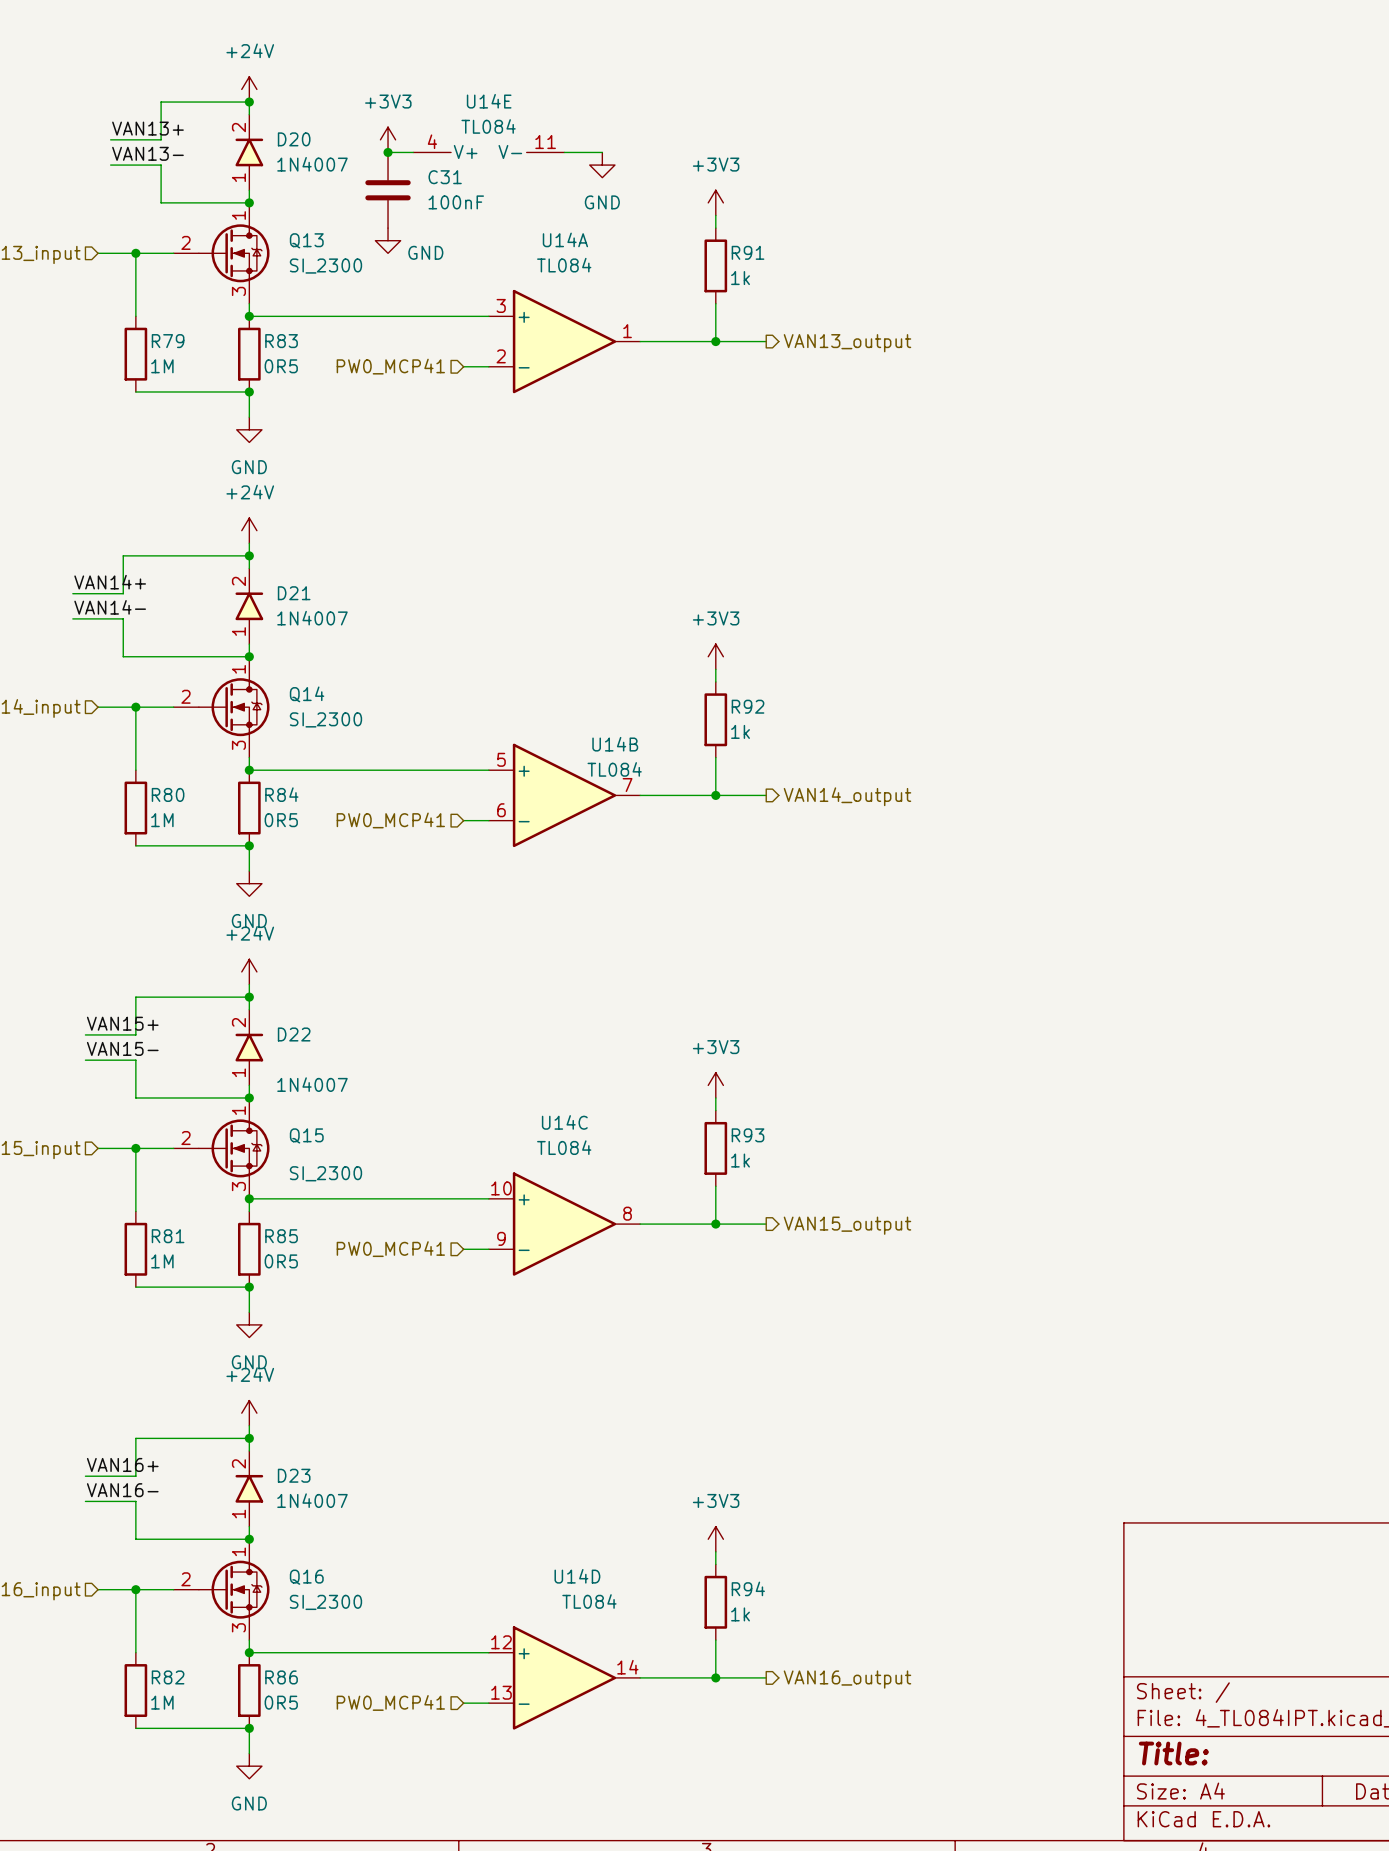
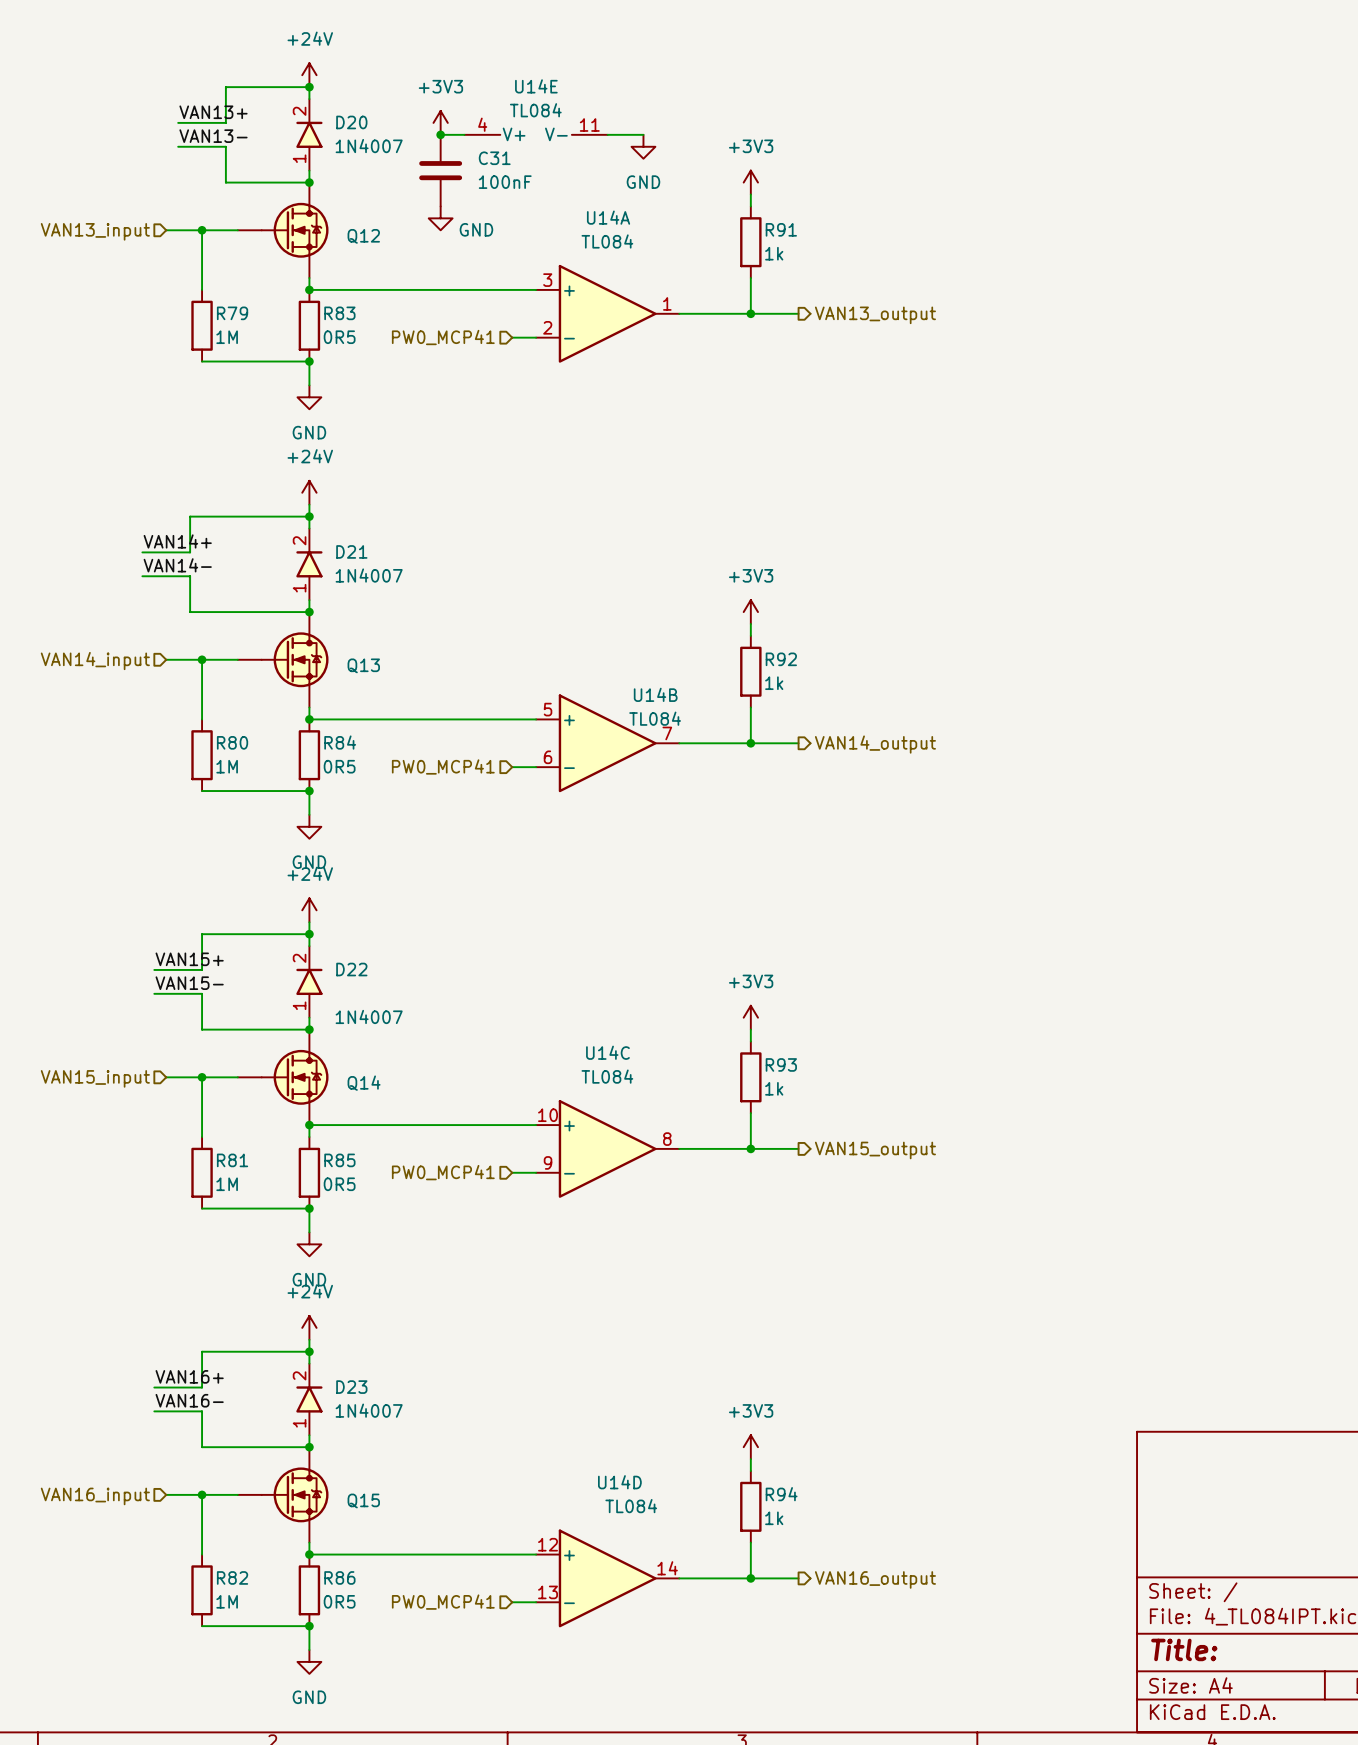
Q13 symbol: [173, 202, 270, 304] -> [237, 612, 329, 708]
Q12: none -> (283, 230)
Q13 value: SI_2300 (325, 266) -> none
Q14 symbol: [173, 656, 270, 758] -> [237, 1029, 329, 1126]
Q14 value: SI_2300 (325, 719) -> none
Q15 symbol: [173, 1097, 270, 1199] -> [237, 1447, 329, 1543]
Q15 value: SI_2300 (325, 1173) -> none
Q16: SI_2300 (221, 1589) -> none

